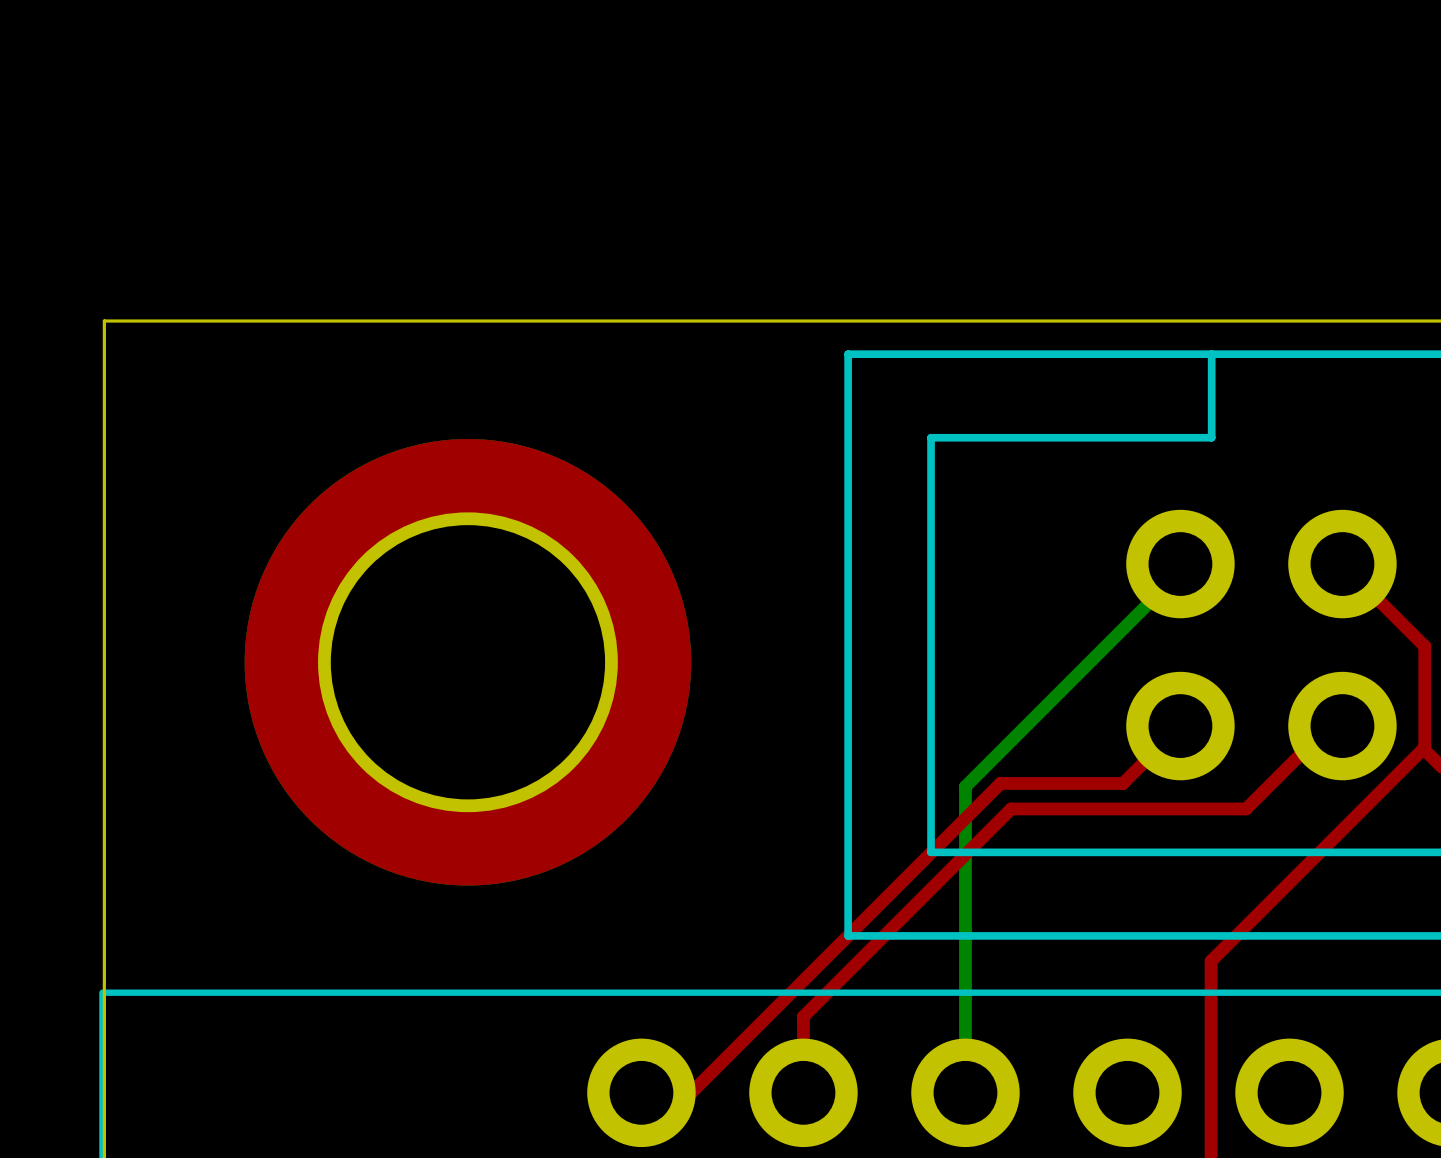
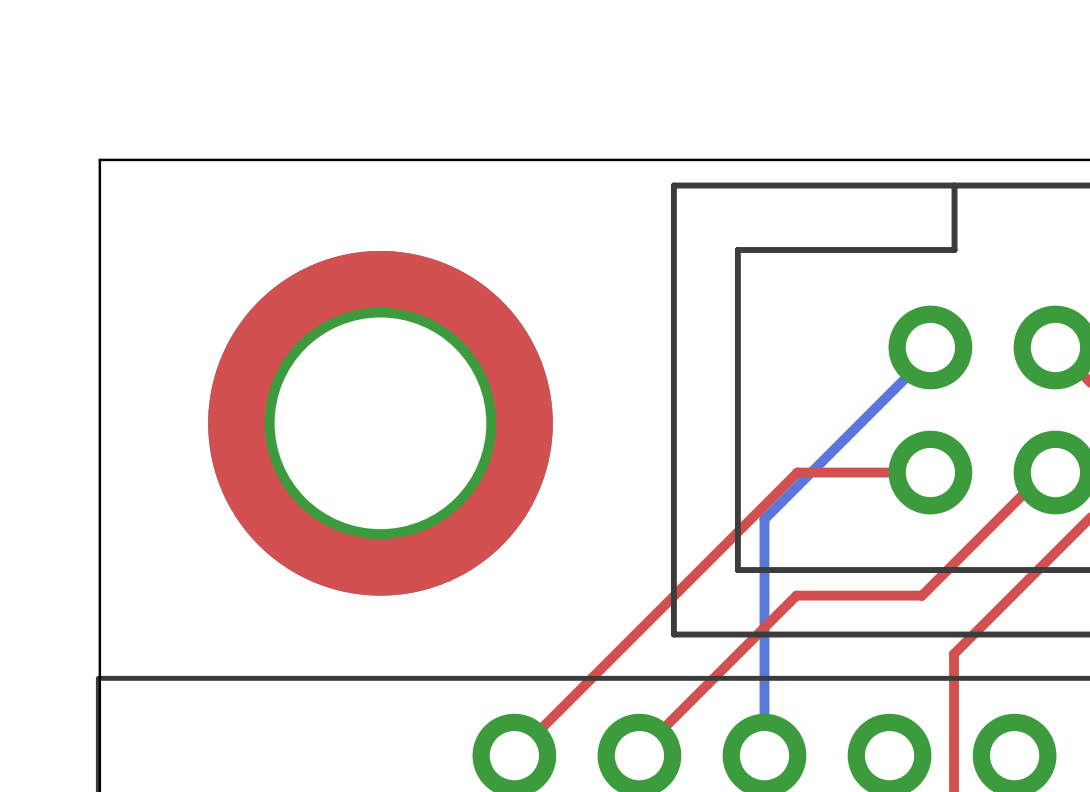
top track: (1180, 726) (1123, 783) (1000, 783) (691, 1092) (641, 1092) -> (930, 472) (797, 472) (514, 755)
top track: (1246, 808) (1011, 808) (803, 1016) (803, 1089) -> (981, 536) (922, 595) (796, 595) (639, 752)

